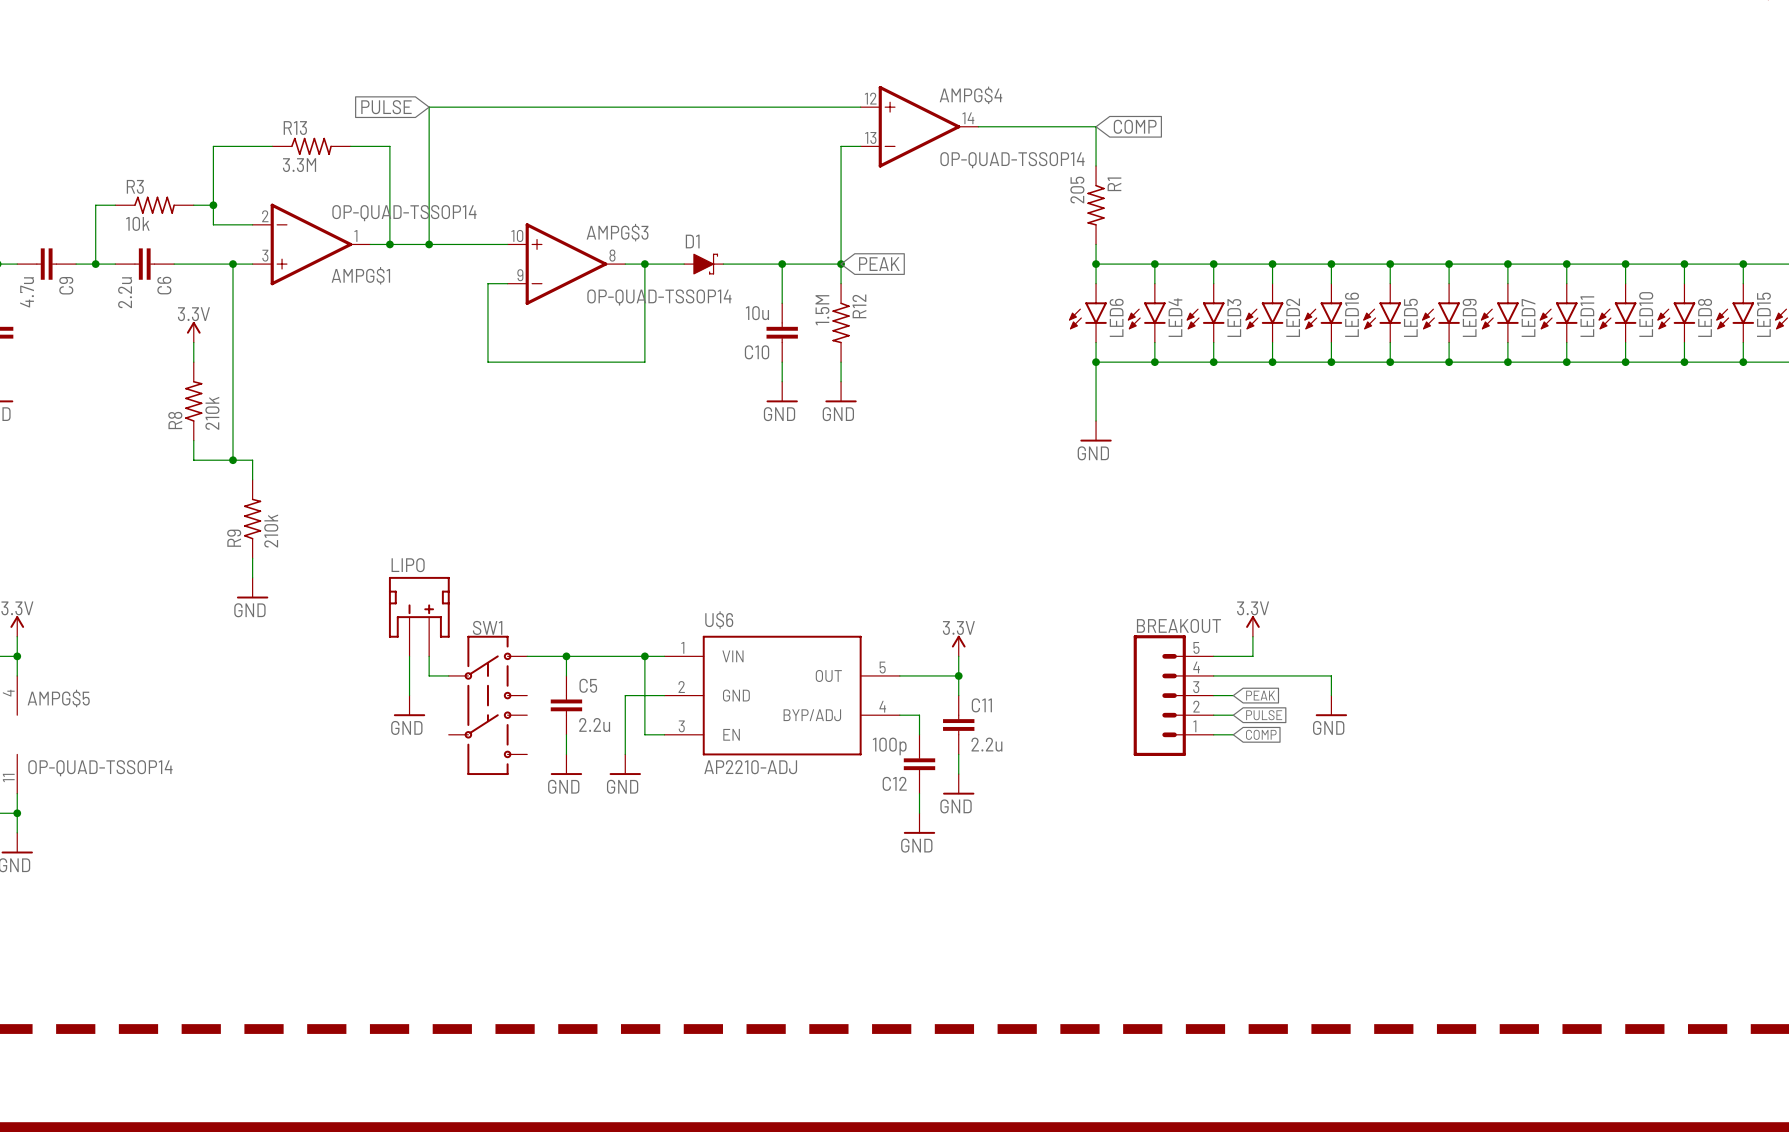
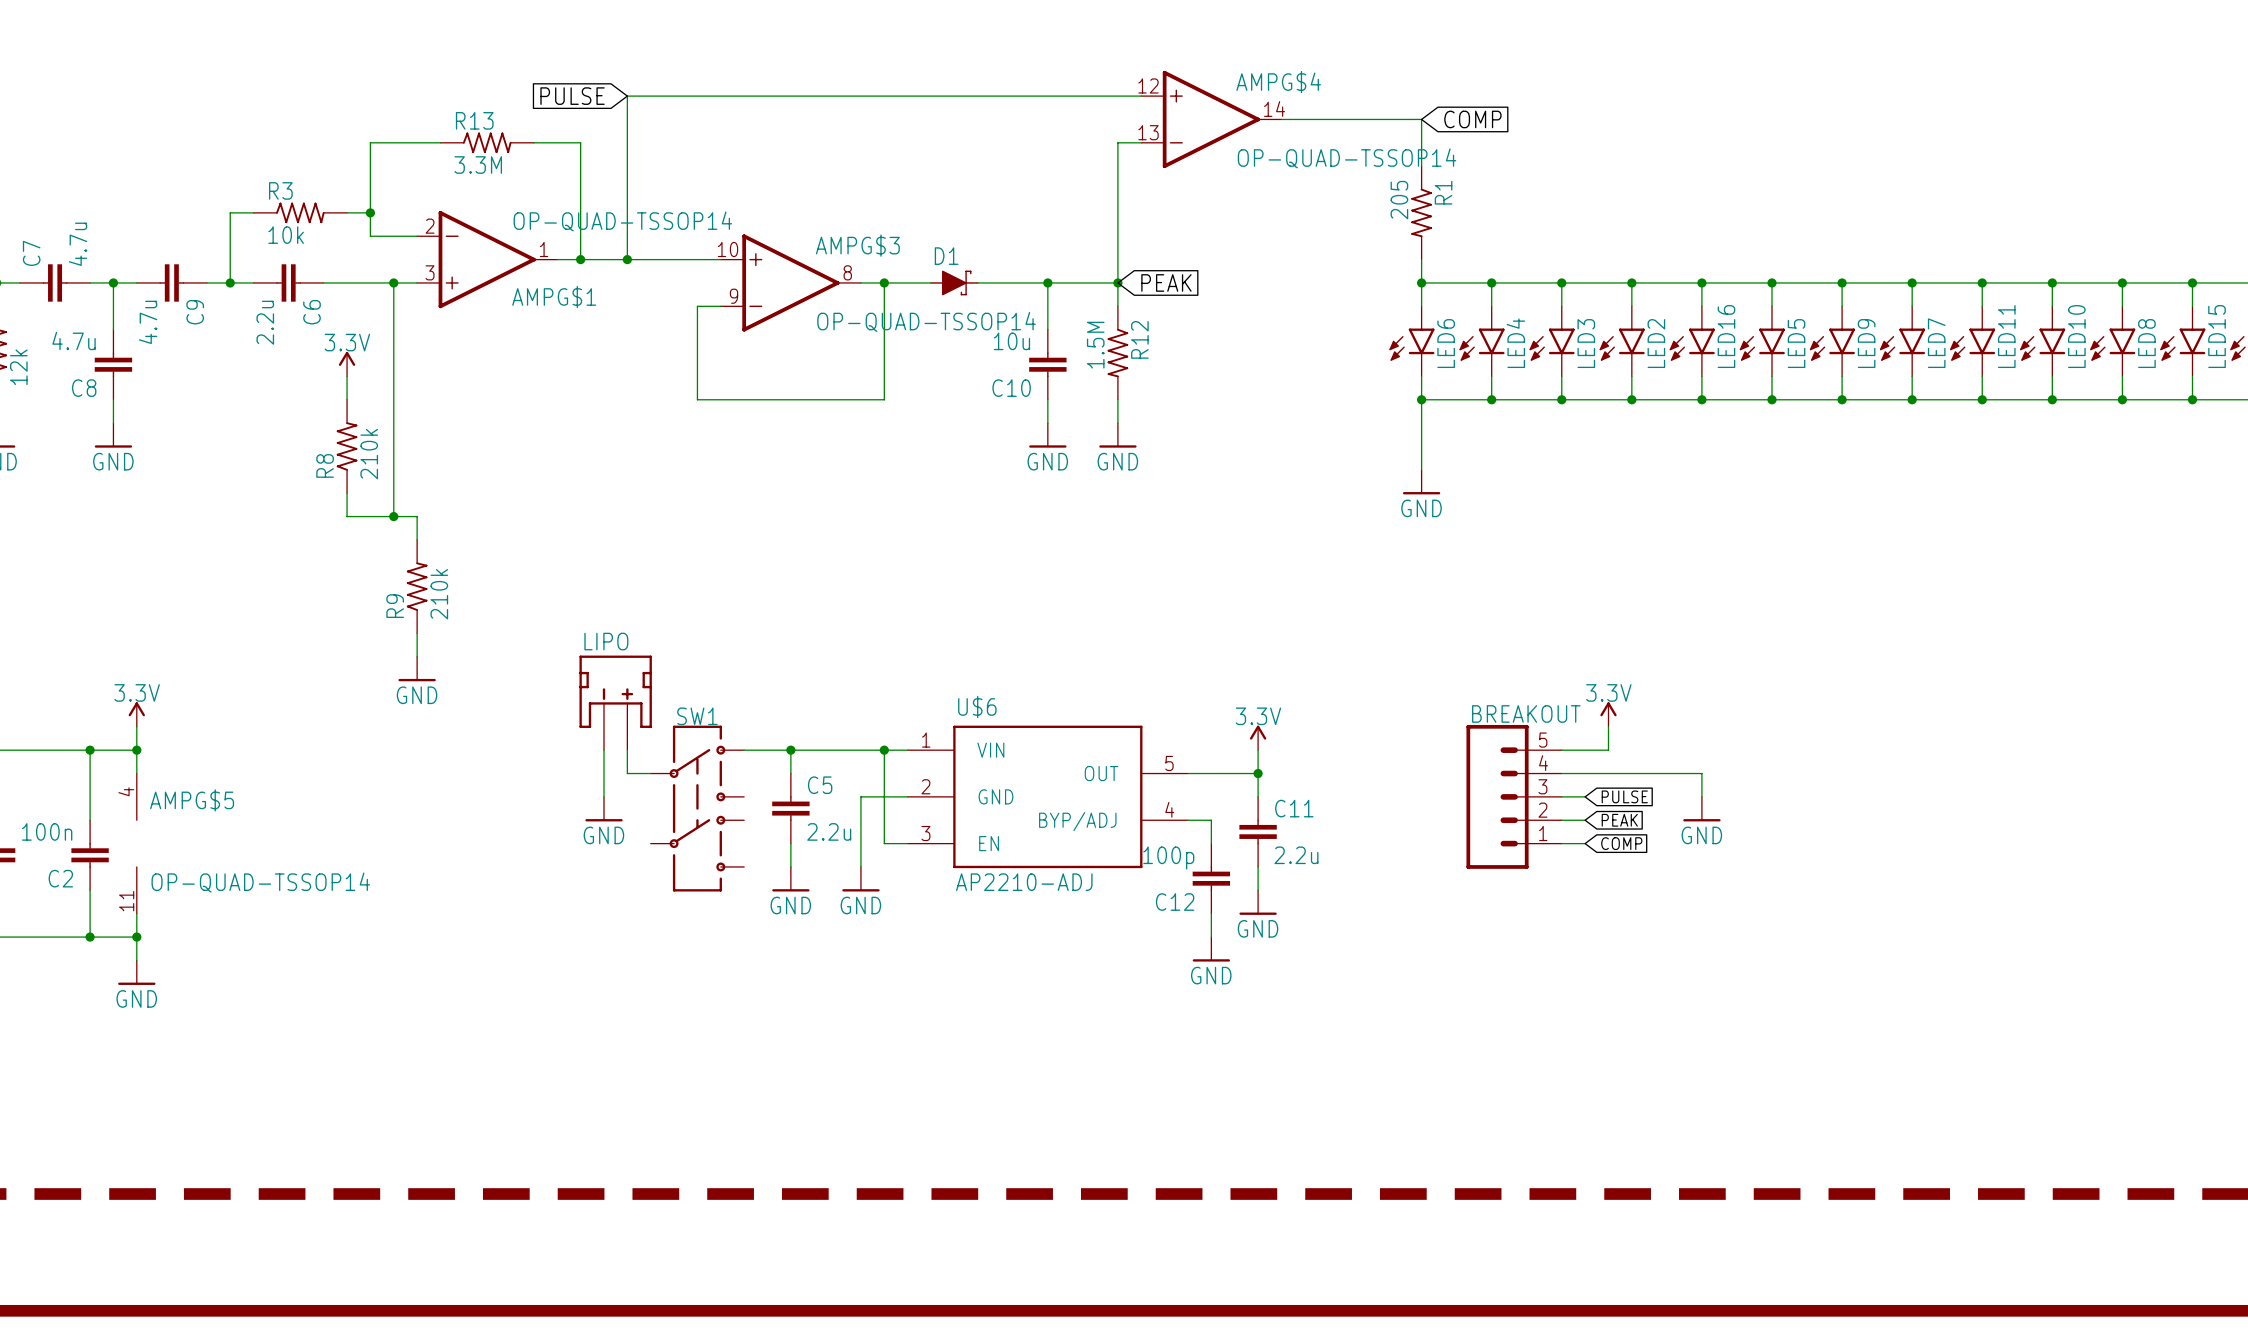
global label: PEAK (1260, 695) -> PULSE (1624, 796)
global label: PULSE (1264, 715) -> PEAK (1619, 820)

